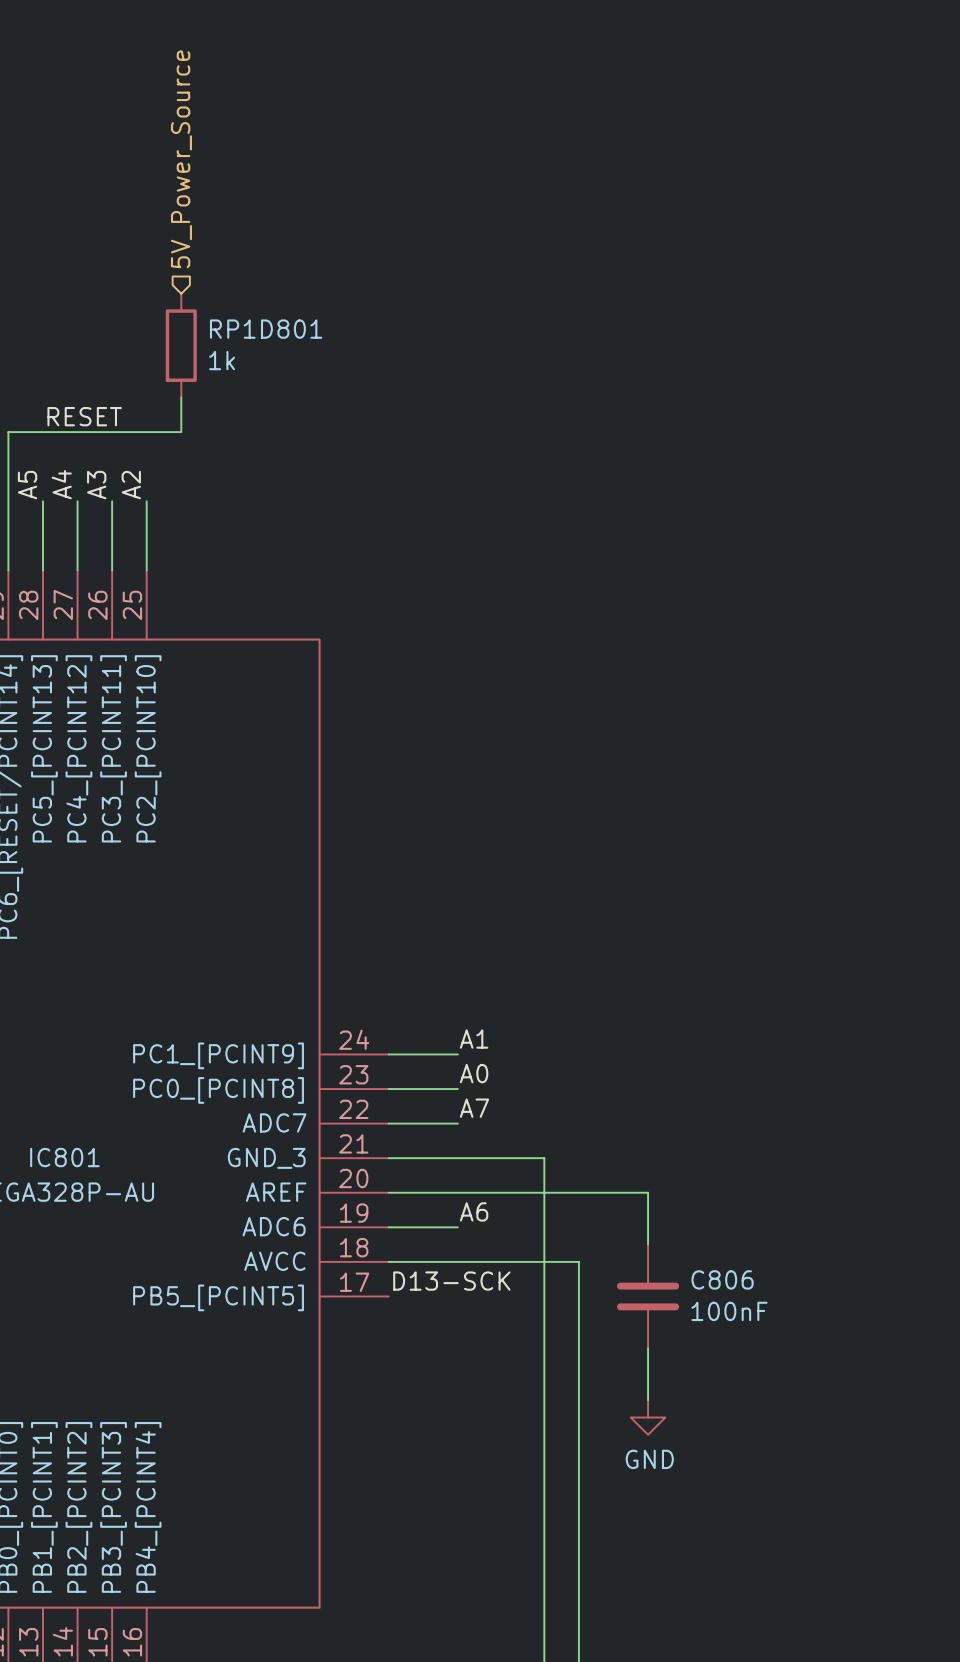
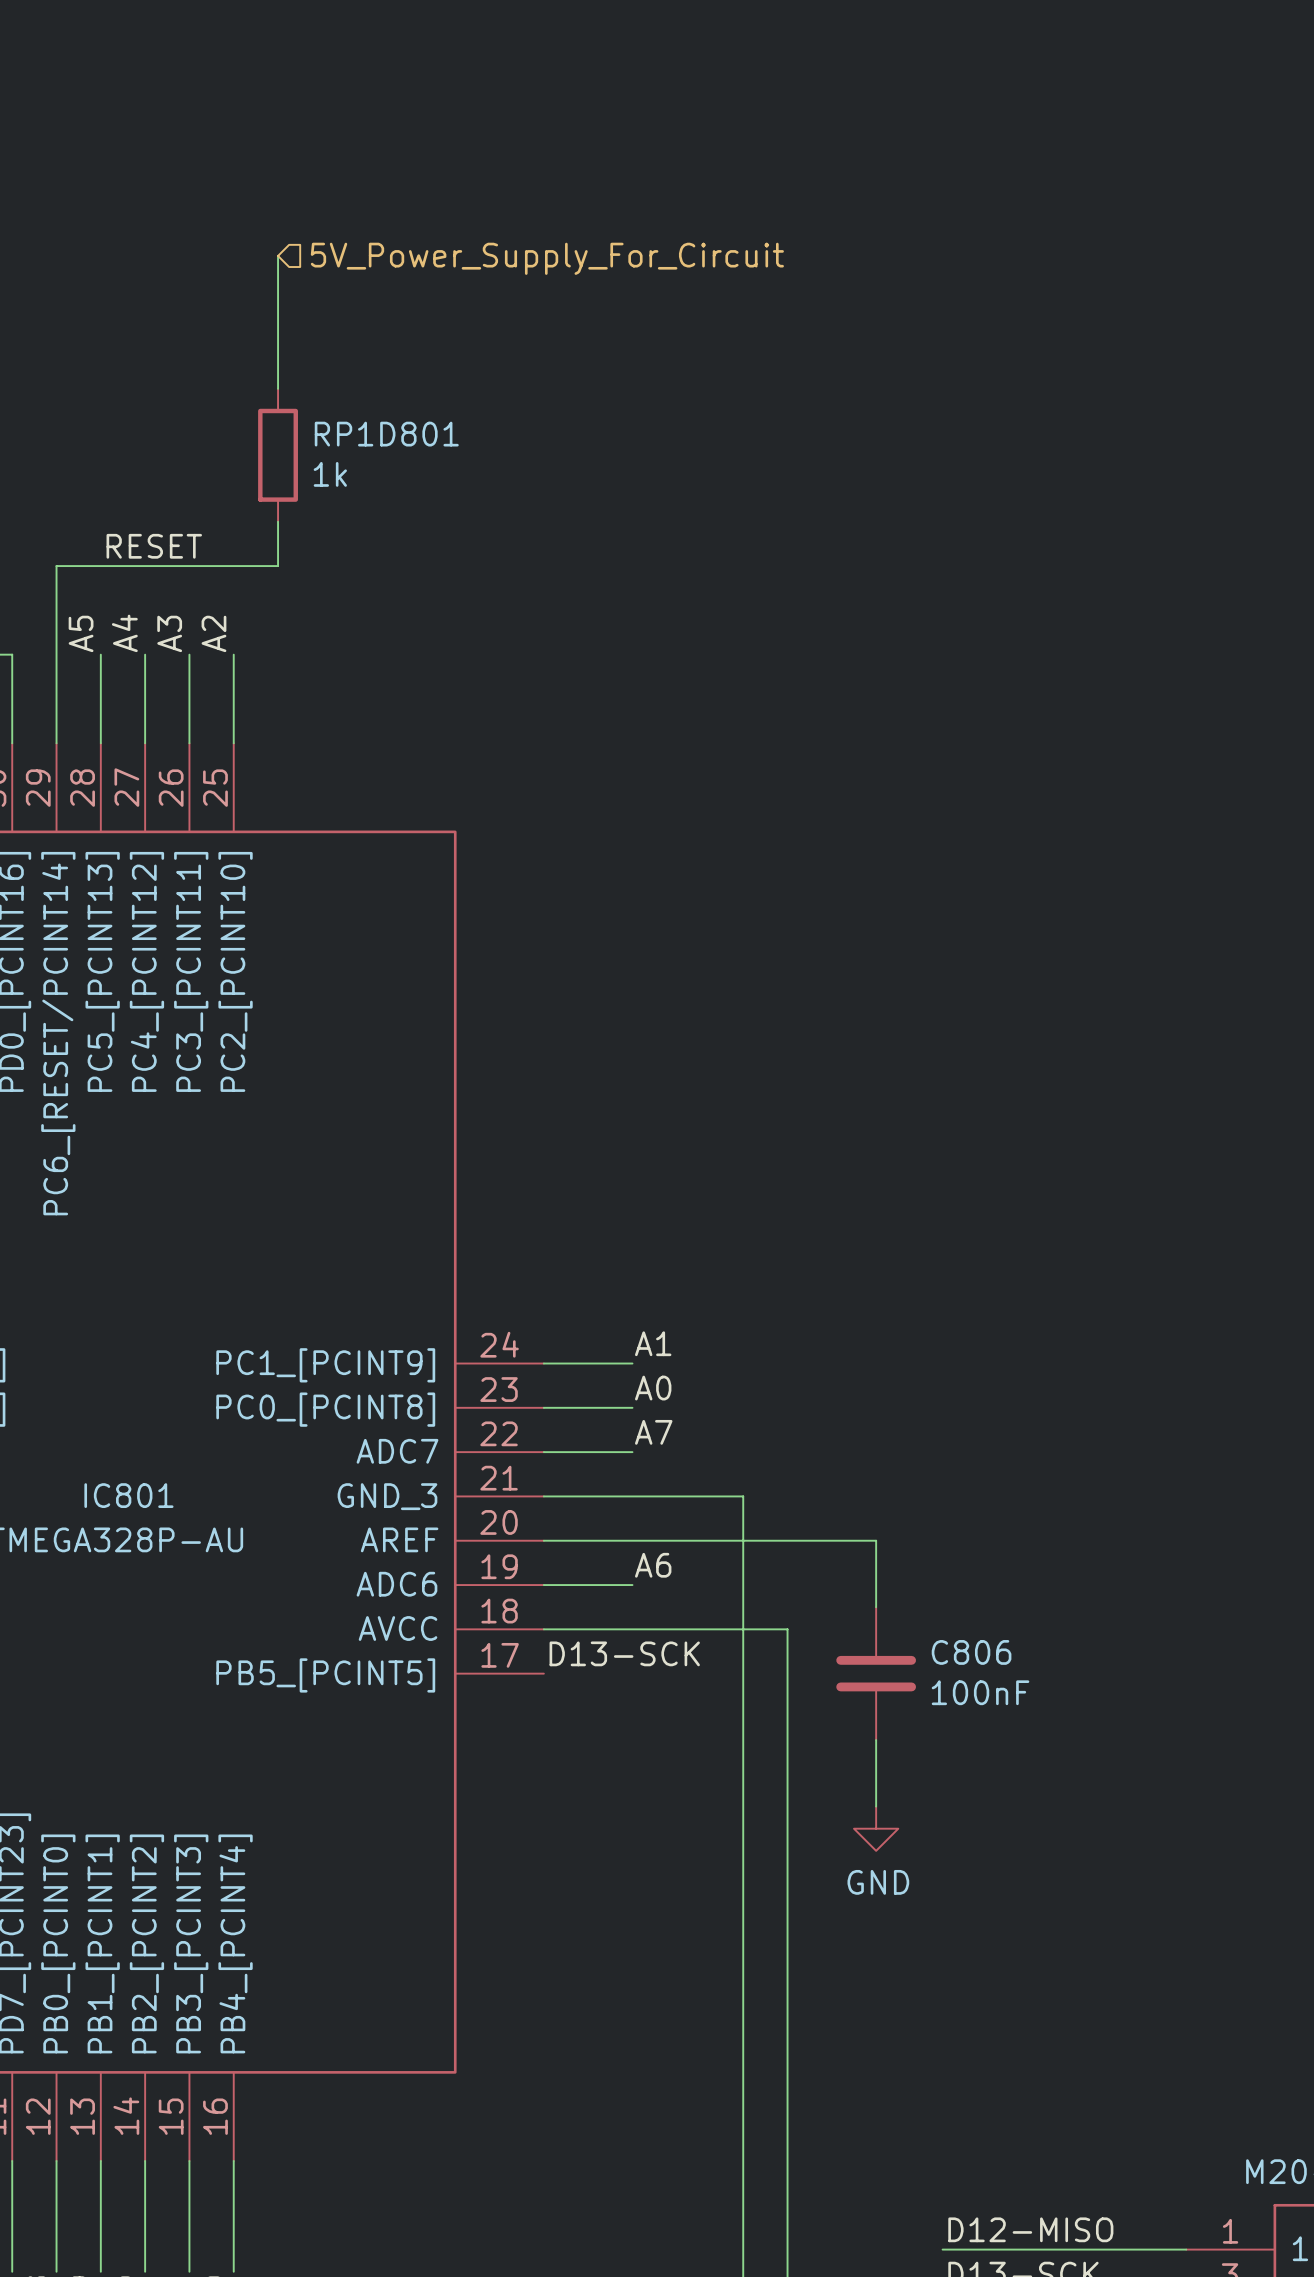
hierarchical label: 5V_Power_Source (181, 159) -> none
wire: none -> (278, 255) (278, 388)
hierarchical label: none -> 5V_Power_Supply_For_Circuit (547, 258)

